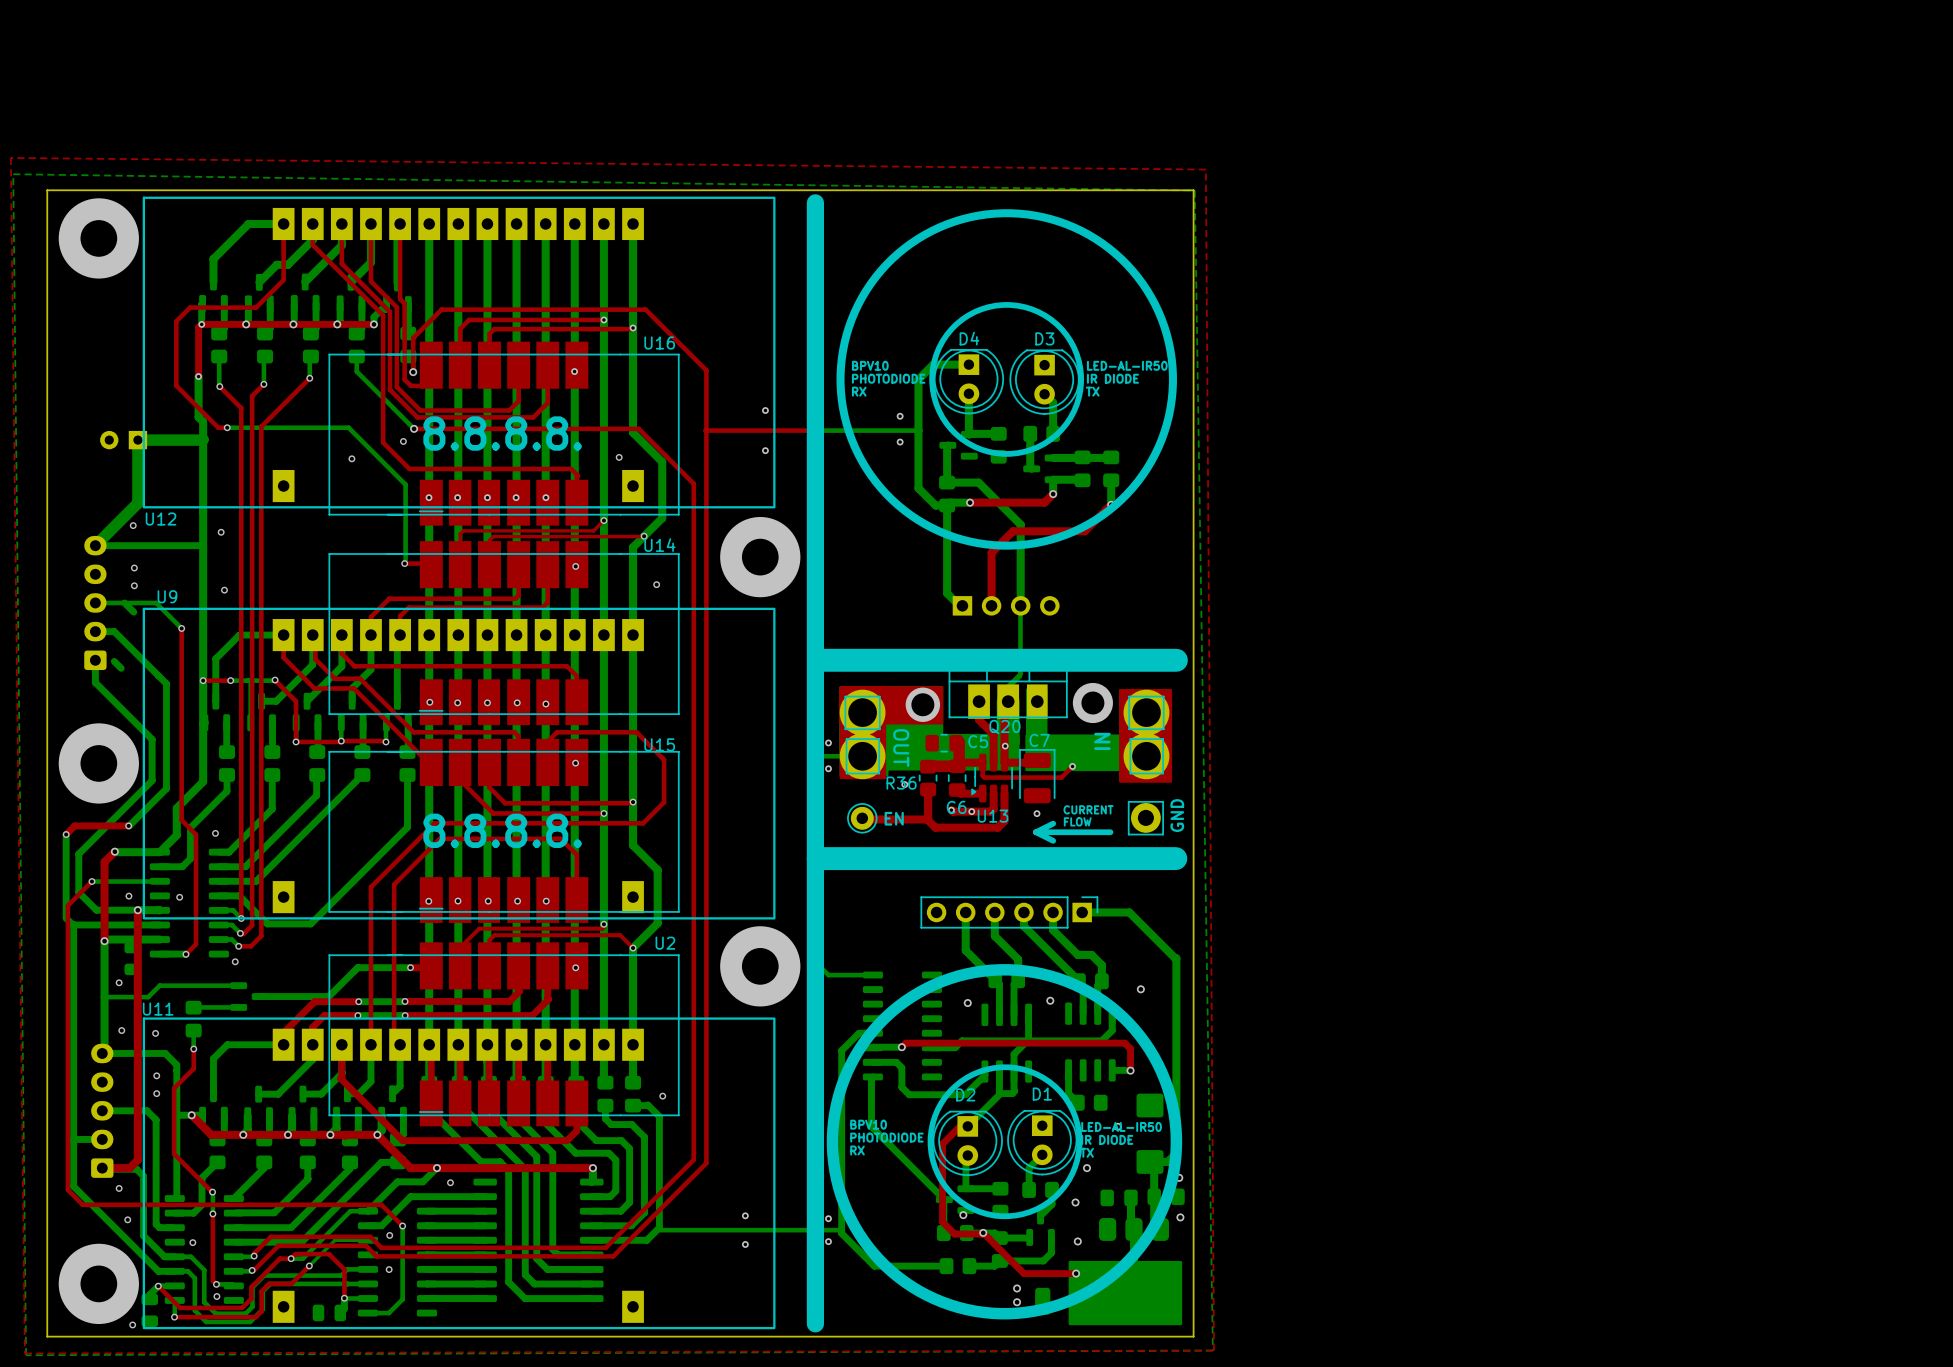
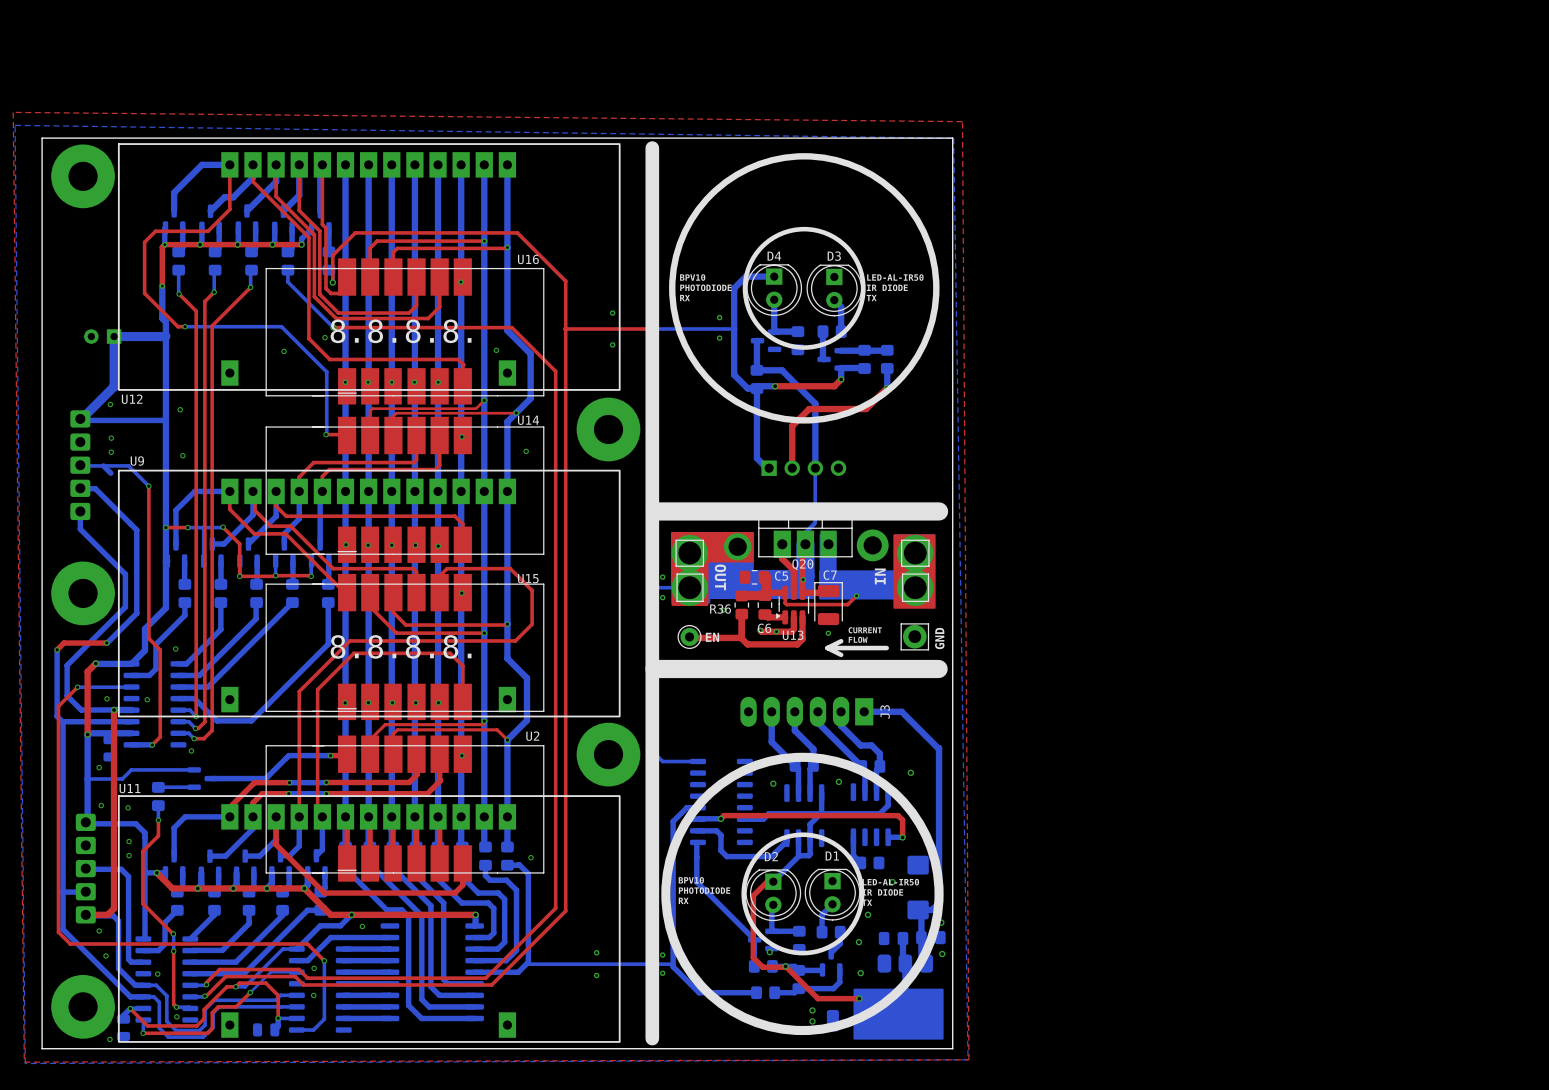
part footprint: [84, 535, 107, 671] -> [70, 410, 91, 521]
bottom track: (114, 661) (121, 668) -> none
part: (1009, 912) -> none
J3: none -> (806, 711)
part footprint: [91, 1043, 114, 1178] -> [75, 813, 96, 924]

